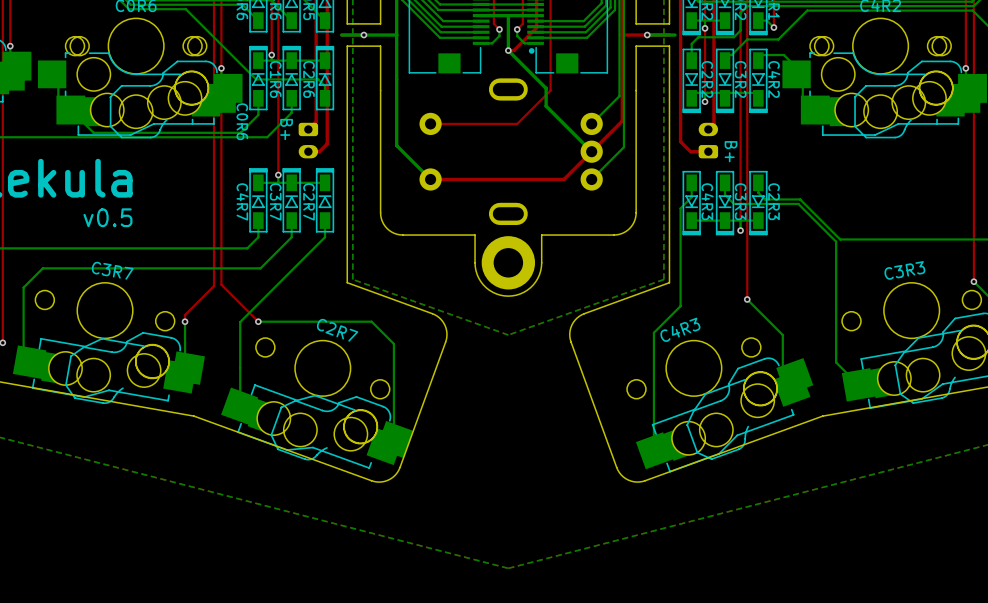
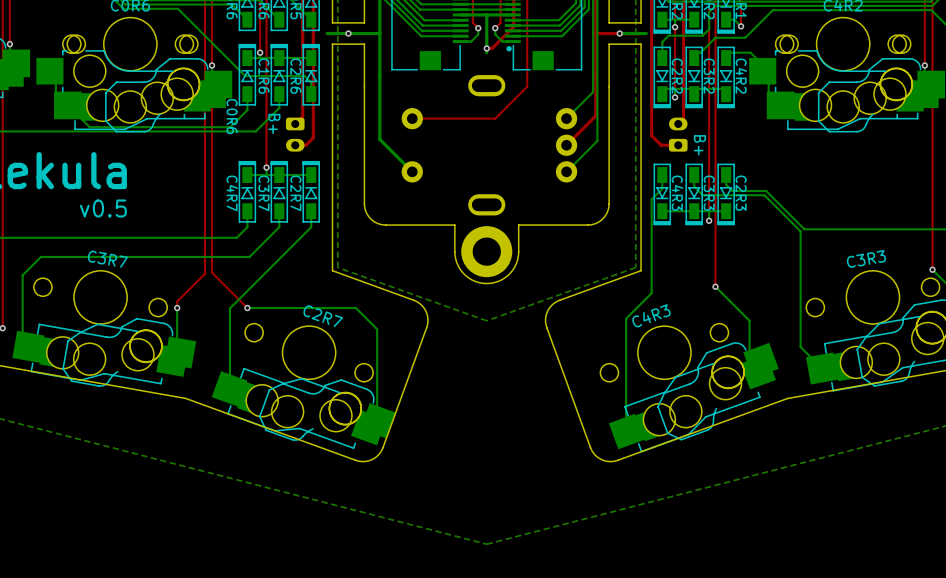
bottom track: (508, 50) (546, 88) (546, 106) (591, 151) -> (486, 48) (486, 52)
top track: (591, 151) (563, 179) (430, 179) -> none

